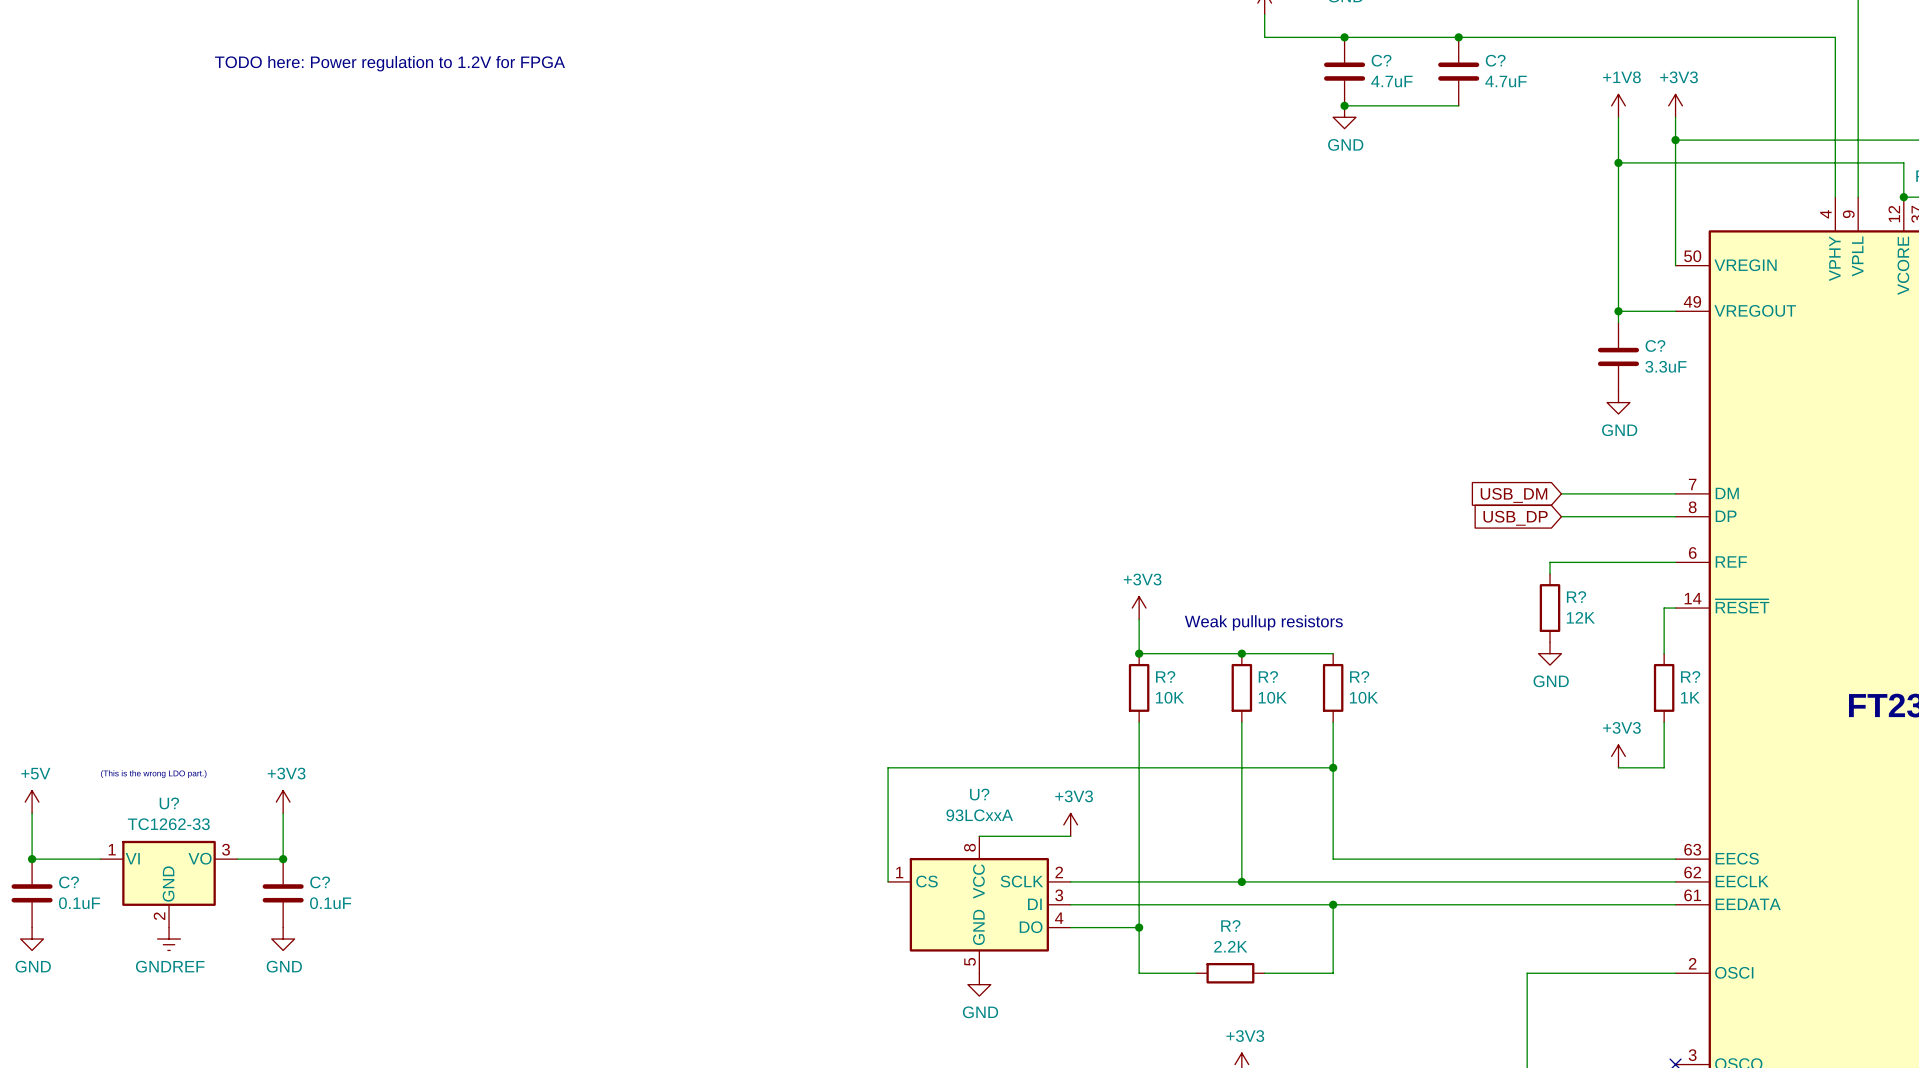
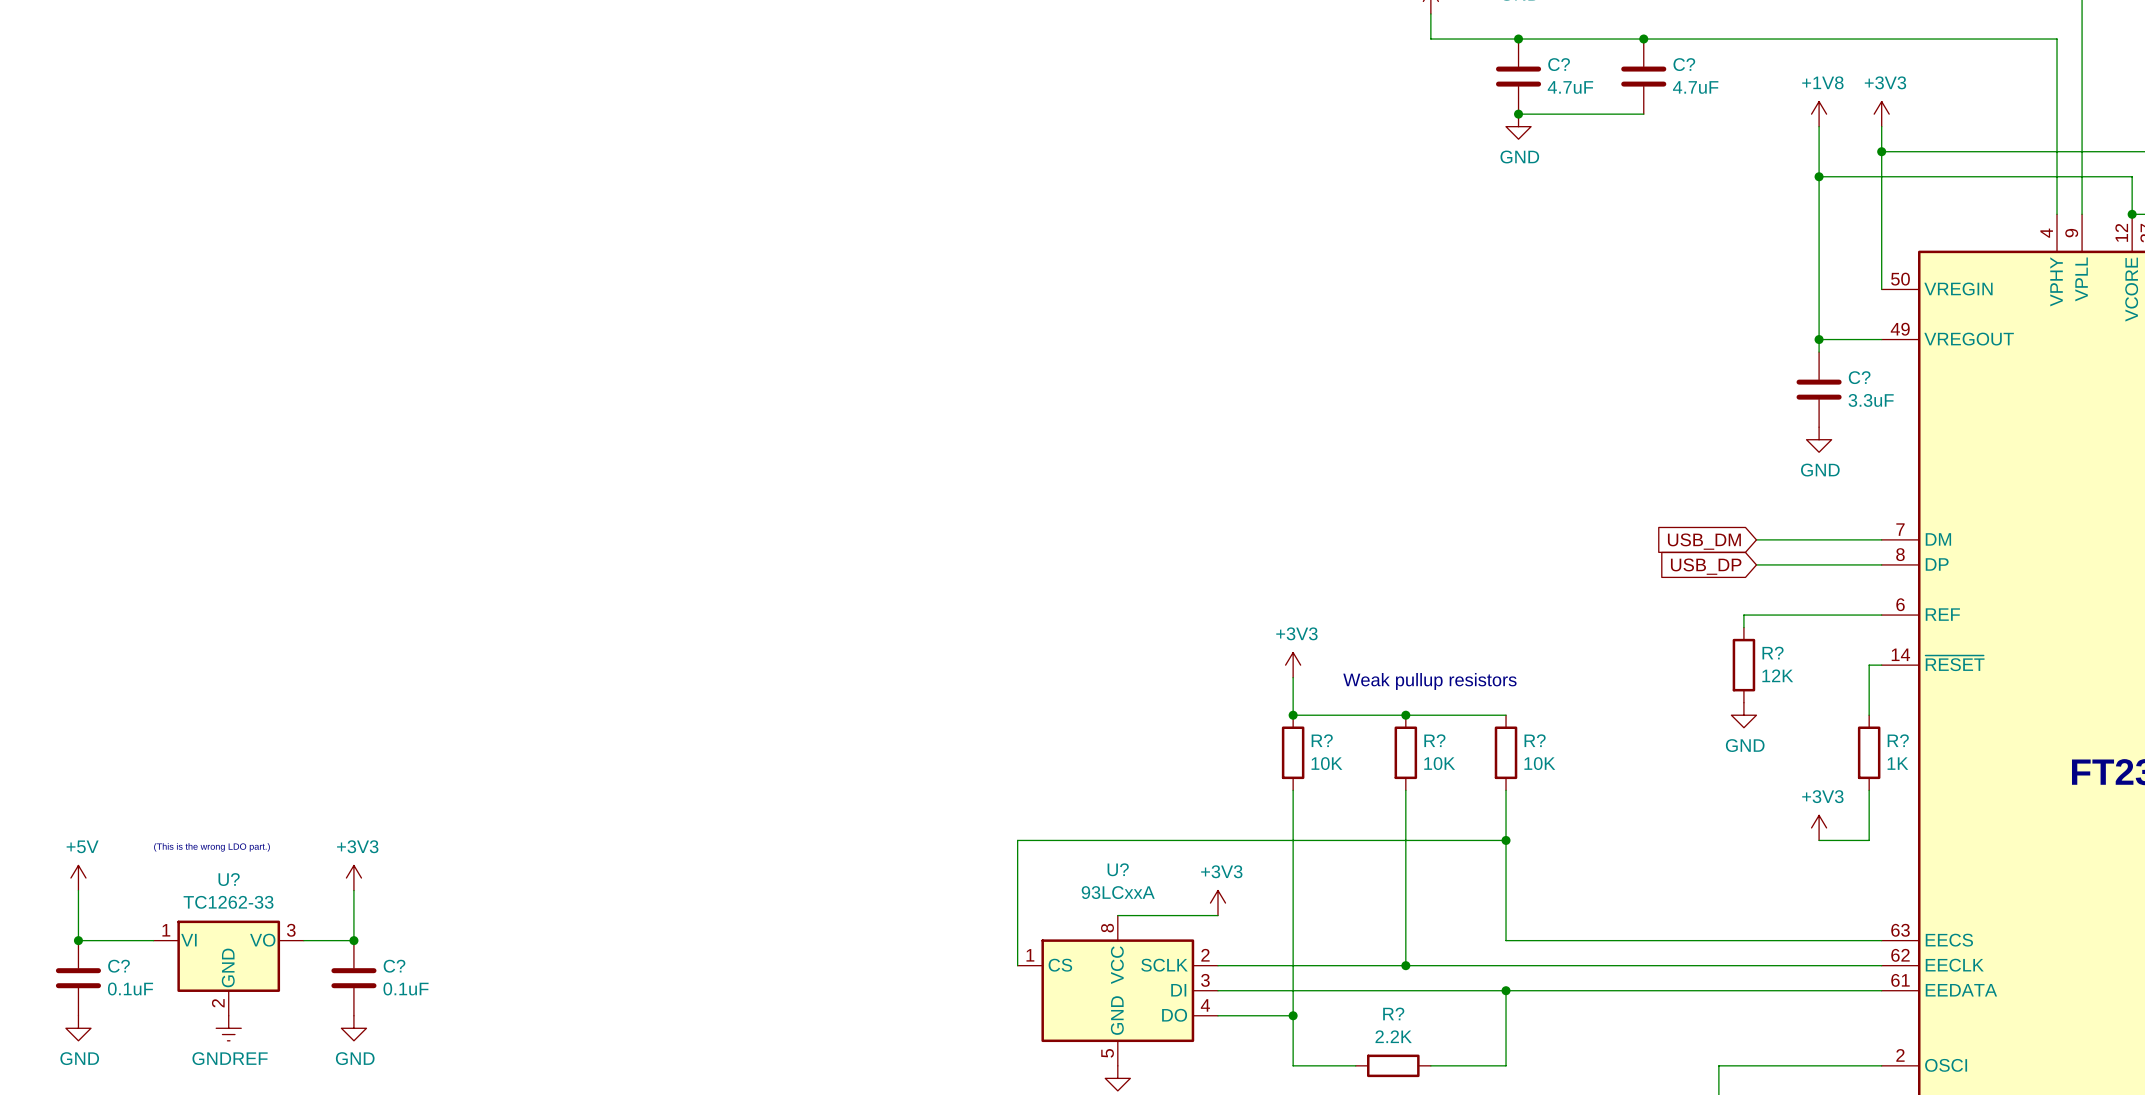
text: TODO here: Power regulation to 1.2V for FPGA (390, 63) -> none

